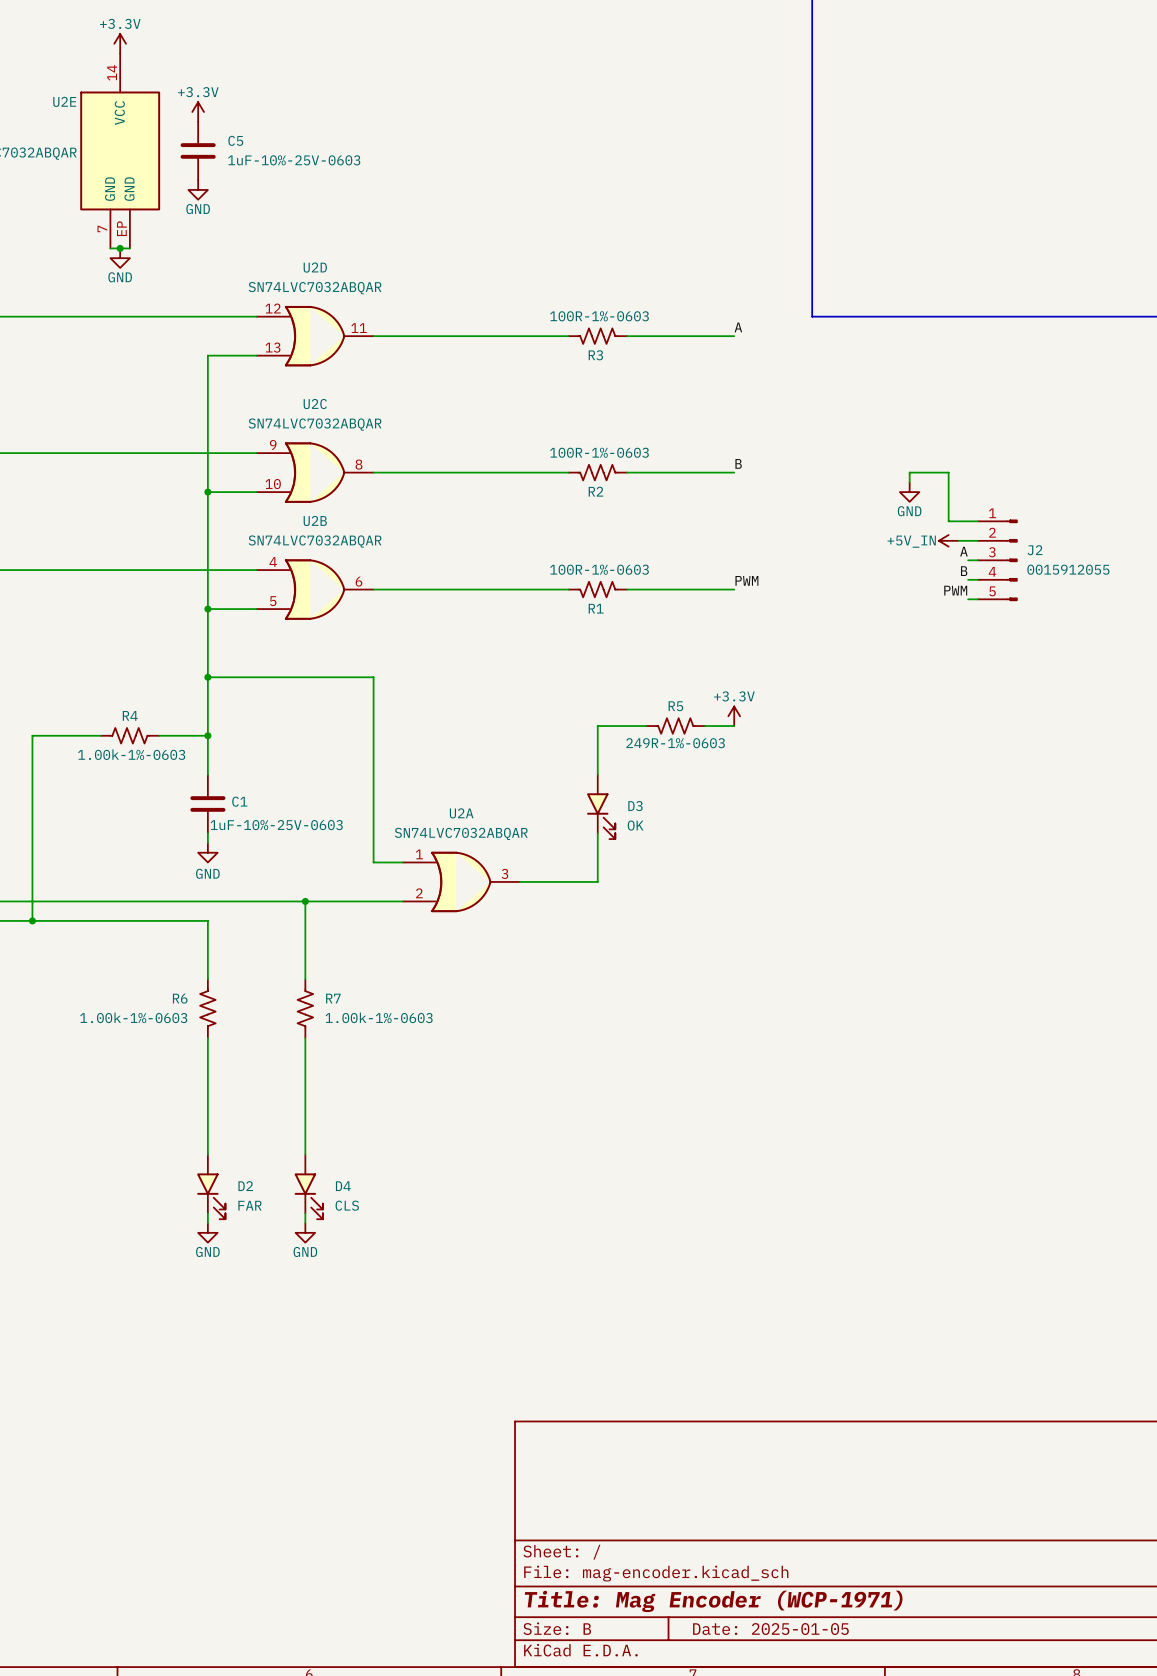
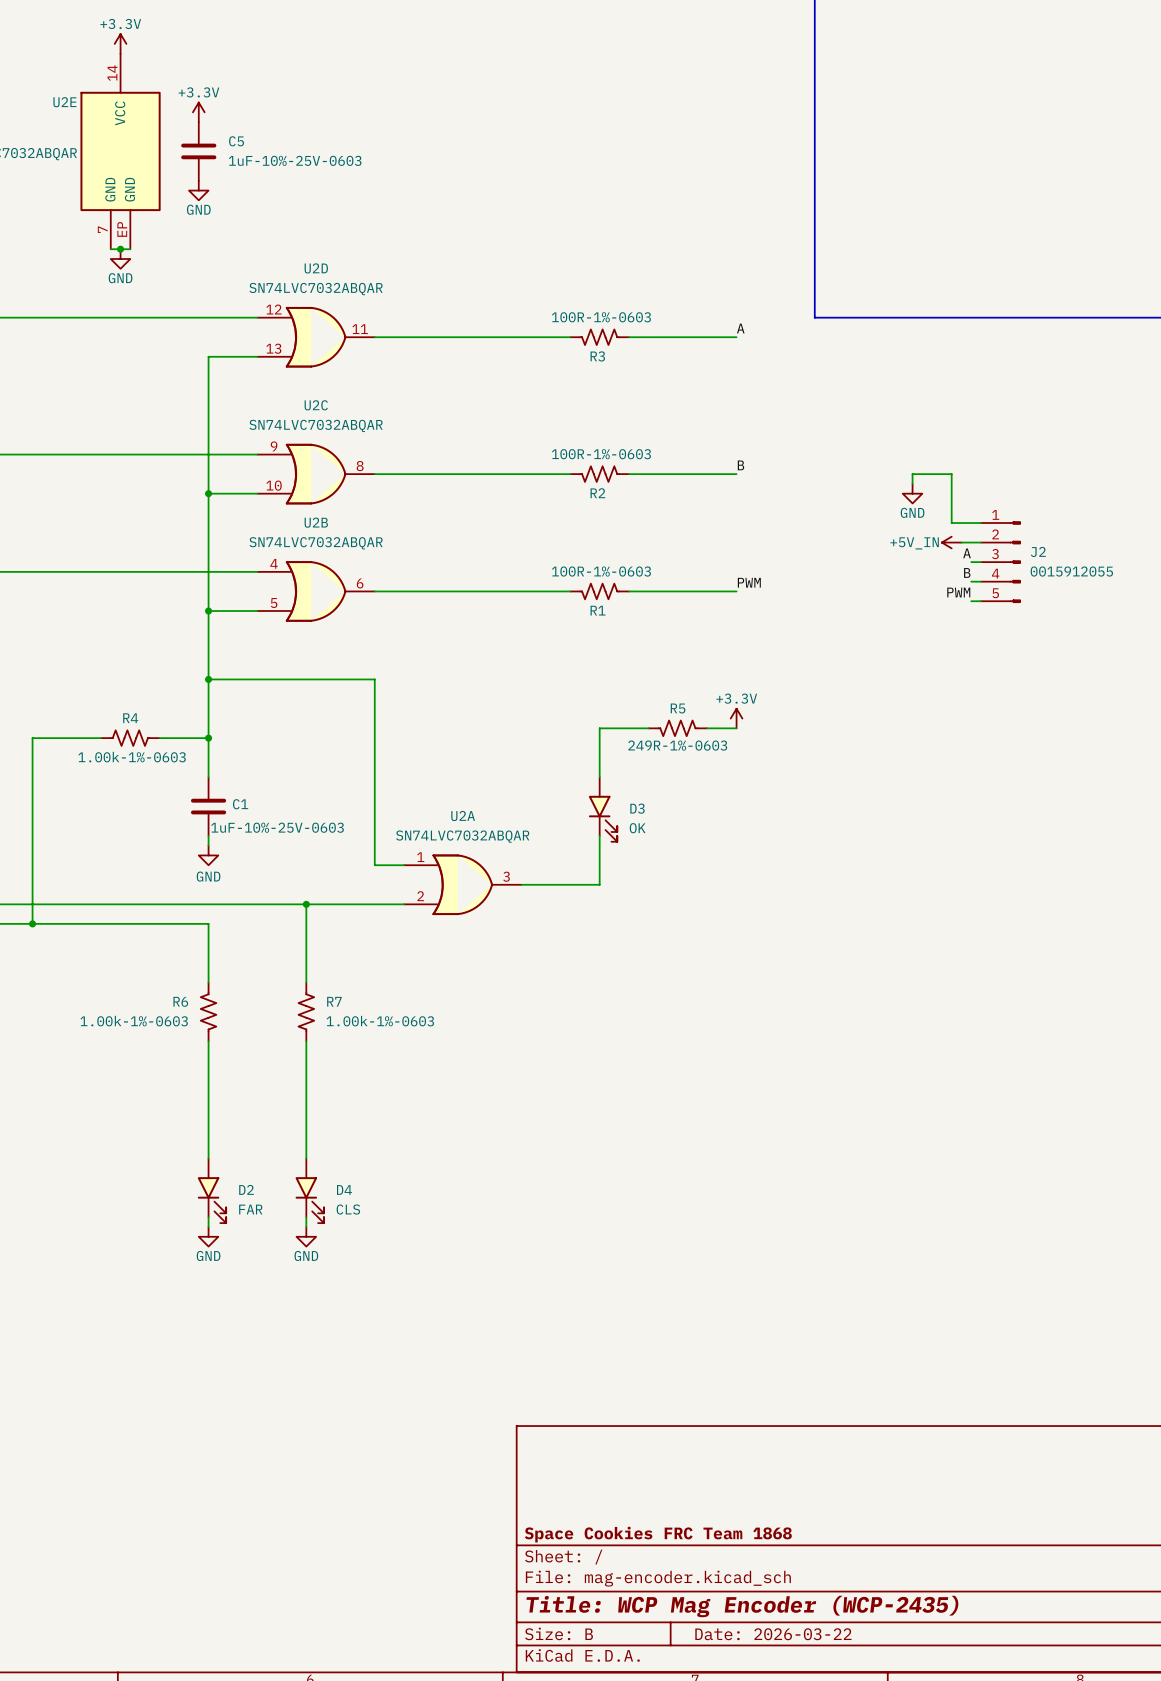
title block: none -> Space Cookies FRC Team 1868 (658, 1534)
title block: Title: Mag Encoder (WCP-1971) (713, 1601) -> Title: WCP Mag Encoder (WCP-2435) (742, 1606)
title block: Date: 2025-01-05 (770, 1629) -> Date: 2026-03-22 (773, 1634)

